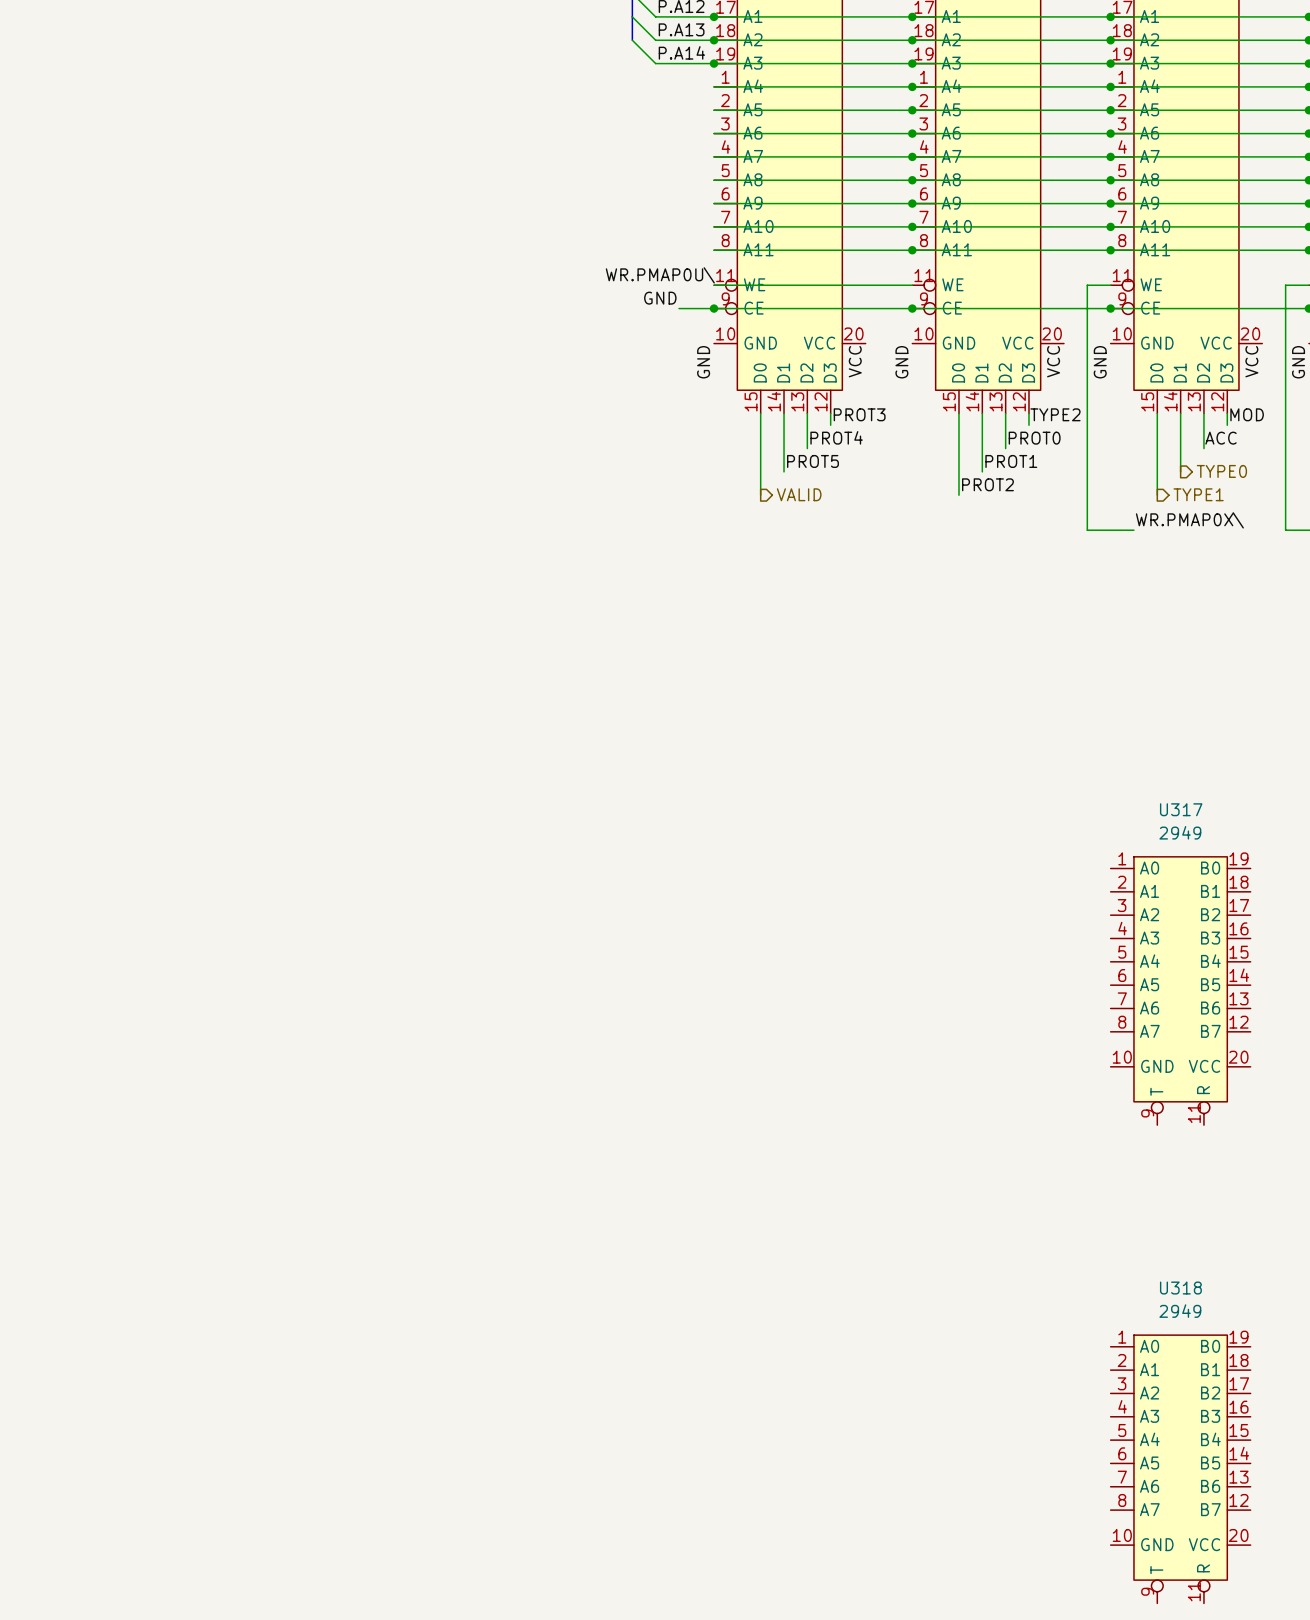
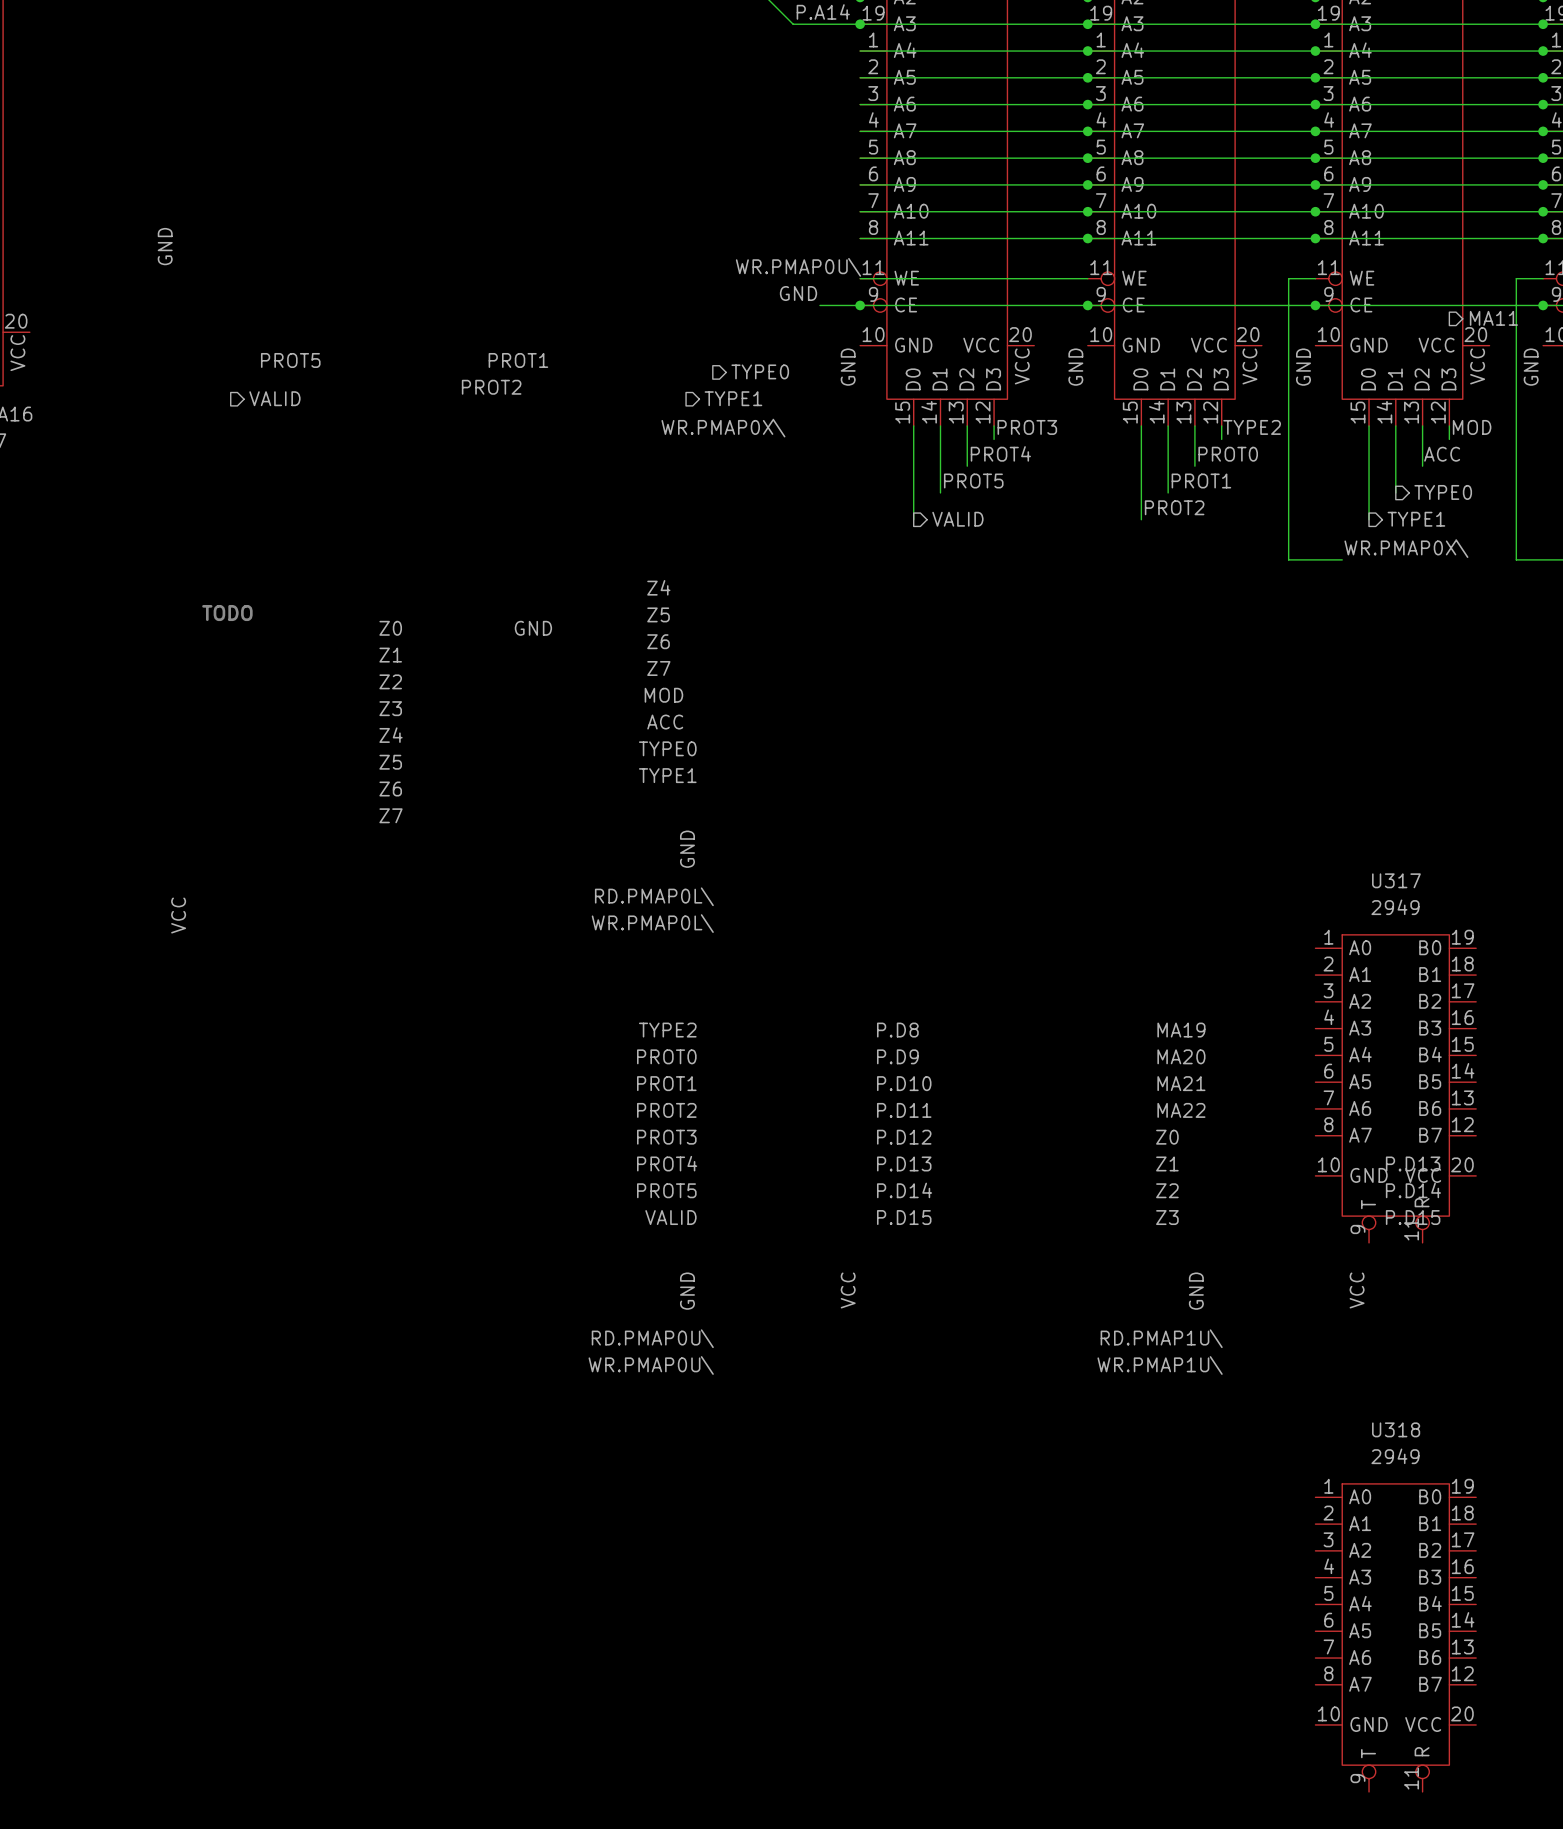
label: none -> GND (165, 246)
hierarchical label: none -> MA11 (1493, 318)
label: none -> PROT5 (290, 360)
label: none -> PROT1 (518, 360)
hierarchical label: none -> TYPE0 (760, 371)
label: none -> PROT2 (491, 387)
hierarchical label: none -> VALID (274, 398)
hierarchical label: none -> TYPE1 (733, 398)
label: none -> WR.PMAP0X\ (723, 428)
label: none -> Z4 (658, 587)
text: none -> TODO (227, 613)
label: none -> Z5 (658, 614)
label: none -> Z0 (390, 628)
label: none -> GND (533, 628)
label: none -> Z6 (658, 641)
label: none -> Z1 (390, 655)
label: none -> Z7 (658, 668)
label: none -> Z2 (390, 681)
label: none -> MOD (663, 695)
label: none -> Z3 (390, 708)
label: none -> ACC (665, 722)
label: none -> Z4 (391, 735)
label: none -> TYPE0 (667, 748)
label: none -> Z5 (390, 762)
label: none -> TYPE1 (667, 775)
label: none -> Z6 (390, 789)
label: none -> Z7 (391, 815)
label: none -> GND (687, 849)
label: none -> RD.PMAP0L\ (654, 896)
label: none -> VCC (178, 915)
label: none -> WR.PMAP0L\ (652, 923)
label: none -> TYPE2 (667, 1030)
label: none -> P.D8 (897, 1030)
label: none -> MA19 (1181, 1030)
label: none -> PROT0 (666, 1056)
label: none -> P.D9 (897, 1056)
label: none -> MA20 (1181, 1056)
label: none -> PROT1 (666, 1083)
label: none -> P.D10 (904, 1083)
label: none -> MA21 (1181, 1083)
label: none -> PROT2 (666, 1110)
label: none -> P.D11 (904, 1110)
label: none -> MA22 (1181, 1110)
label: none -> PROT3 (666, 1137)
label: none -> P.D12 (904, 1137)
label: none -> Z0 (1167, 1137)
label: none -> PROT4 (667, 1163)
label: none -> P.D13 (904, 1163)
label: none -> Z1 (1167, 1163)
label: none -> P.D13 (1413, 1163)
label: none -> PROT5 (666, 1190)
label: none -> P.D14 (904, 1190)
label: none -> Z2 (1167, 1190)
label: none -> P.D14 (1413, 1190)
label: none -> VALID (670, 1217)
label: none -> P.D15 (904, 1217)
label: none -> Z3 (1167, 1217)
label: none -> P.D15 (1413, 1217)
label: none -> VCC (848, 1290)
label: none -> VCC (1357, 1290)
label: none -> GND (687, 1291)
label: none -> GND (1196, 1291)
label: none -> RD.PMAP0U\ (652, 1338)
label: none -> RD.PMAP1U\ (1161, 1338)
label: none -> WR.PMAP0U\ (651, 1365)
label: none -> WR.PMAP1U\ (1160, 1365)

